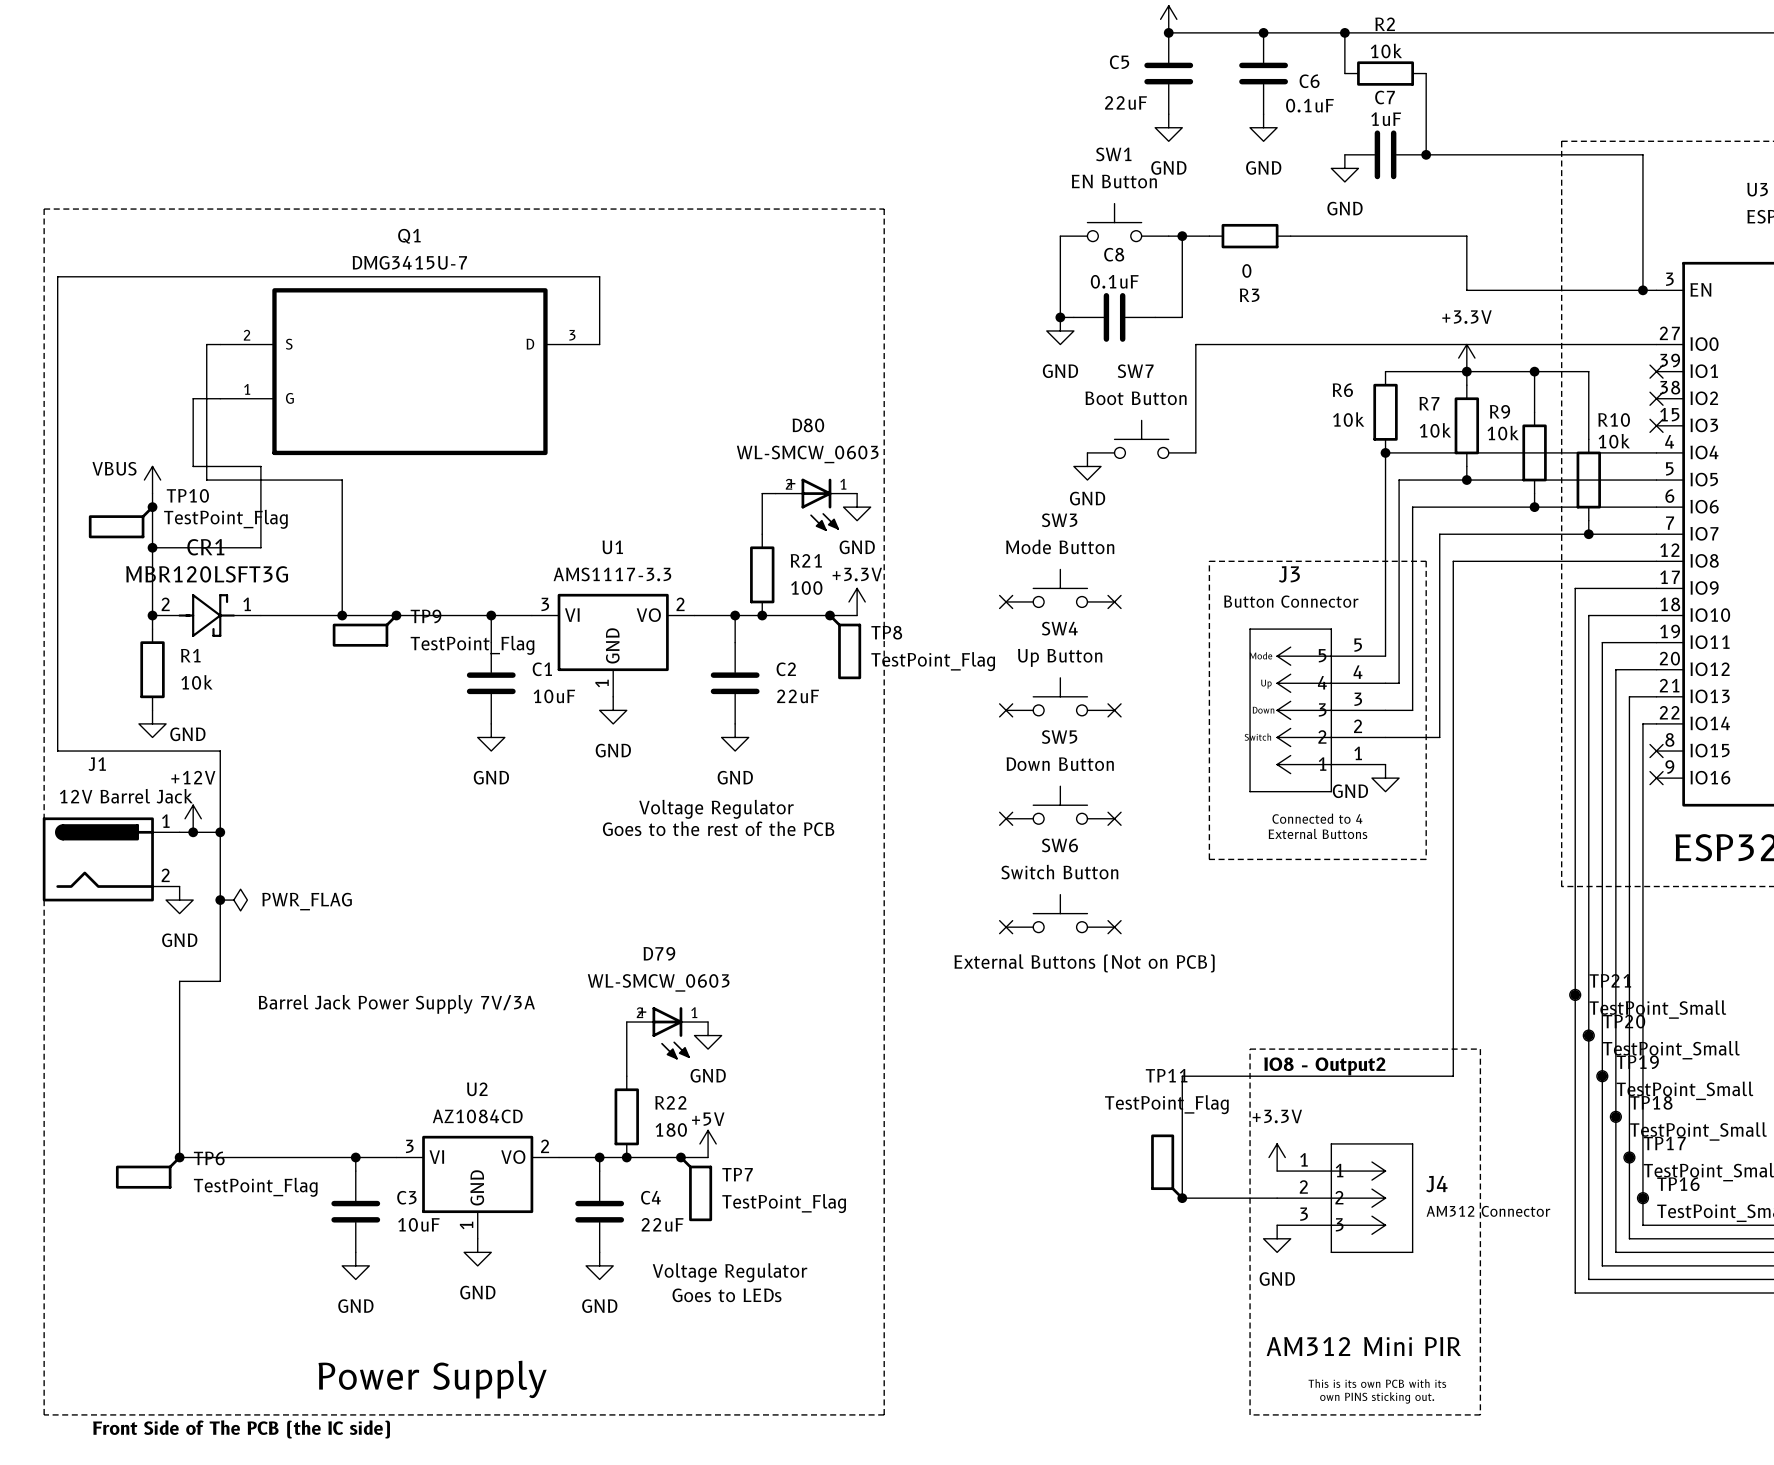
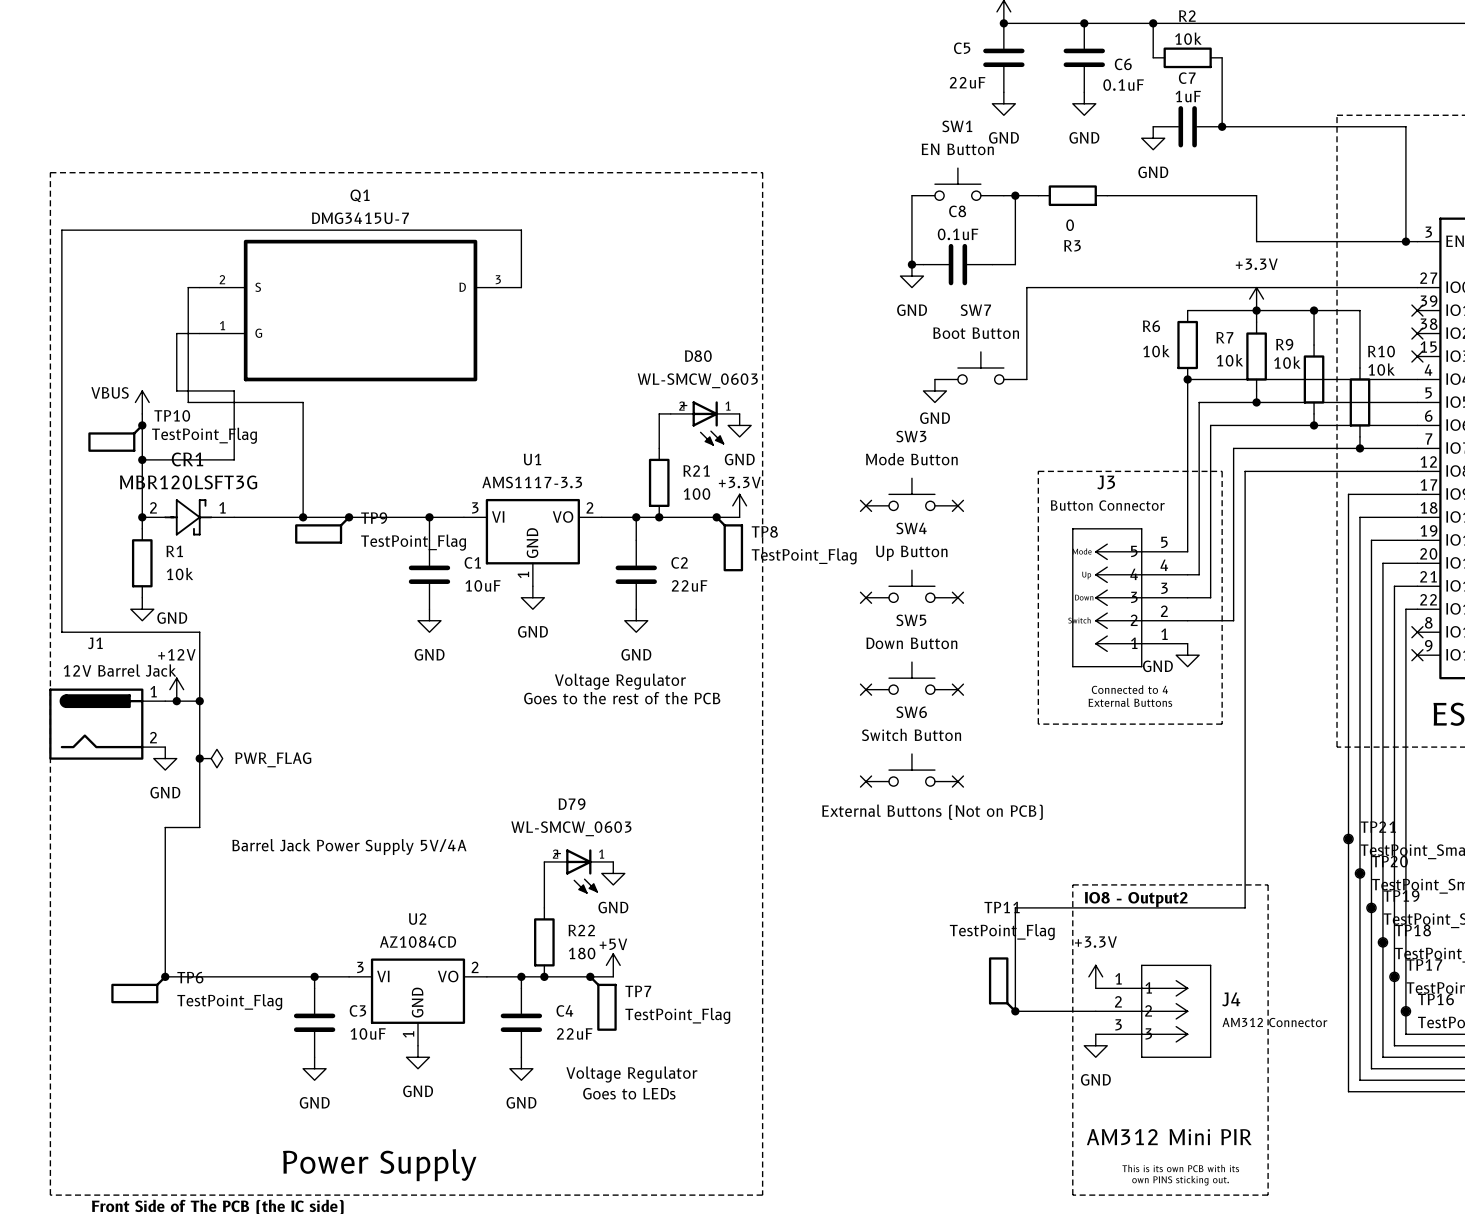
text: Barrel Jack Power Supply 7V/3A (396, 1004) -> Barrel Jack Power Supply 5V/4A (349, 847)

